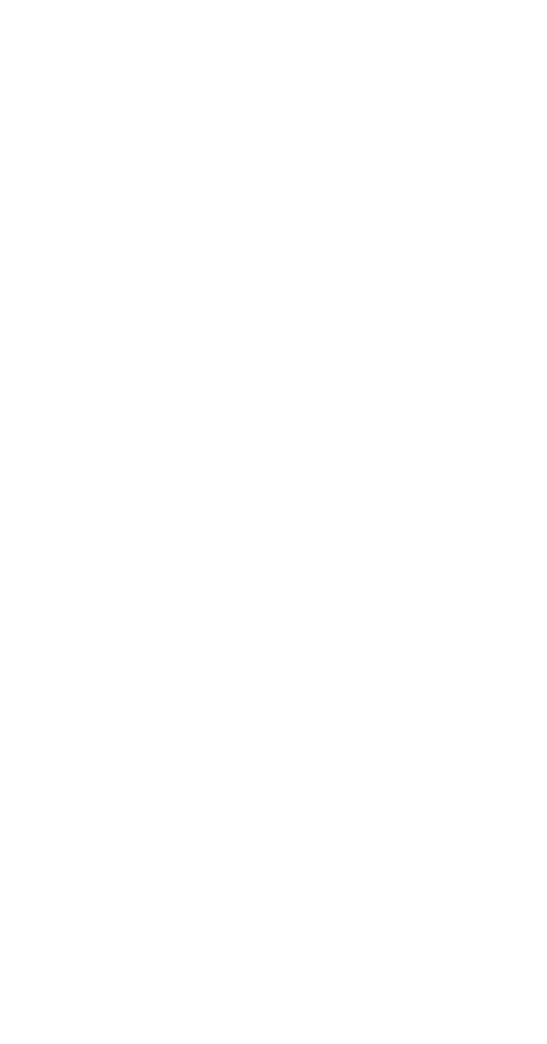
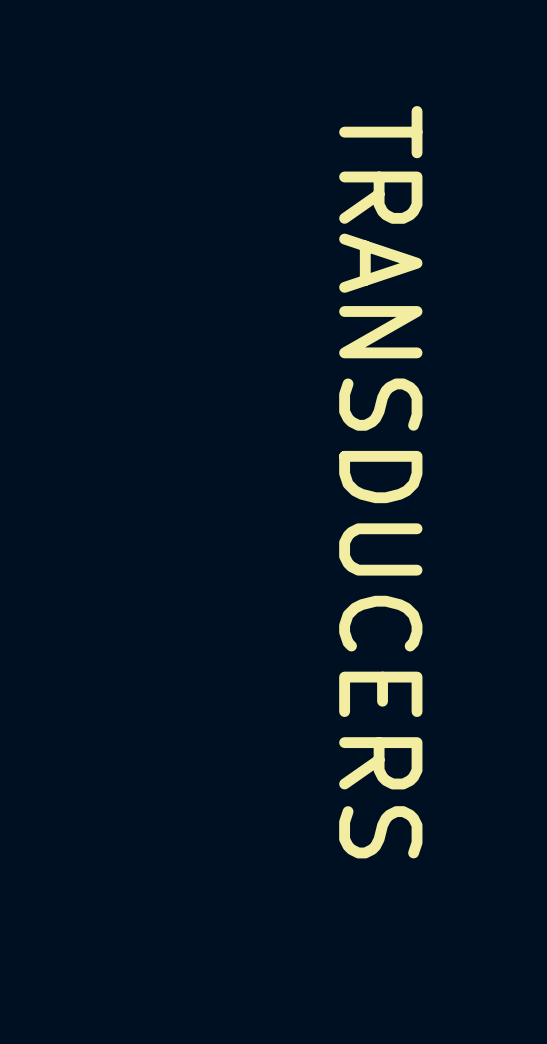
text: none -> TRANSDUCERS (380, 482)

